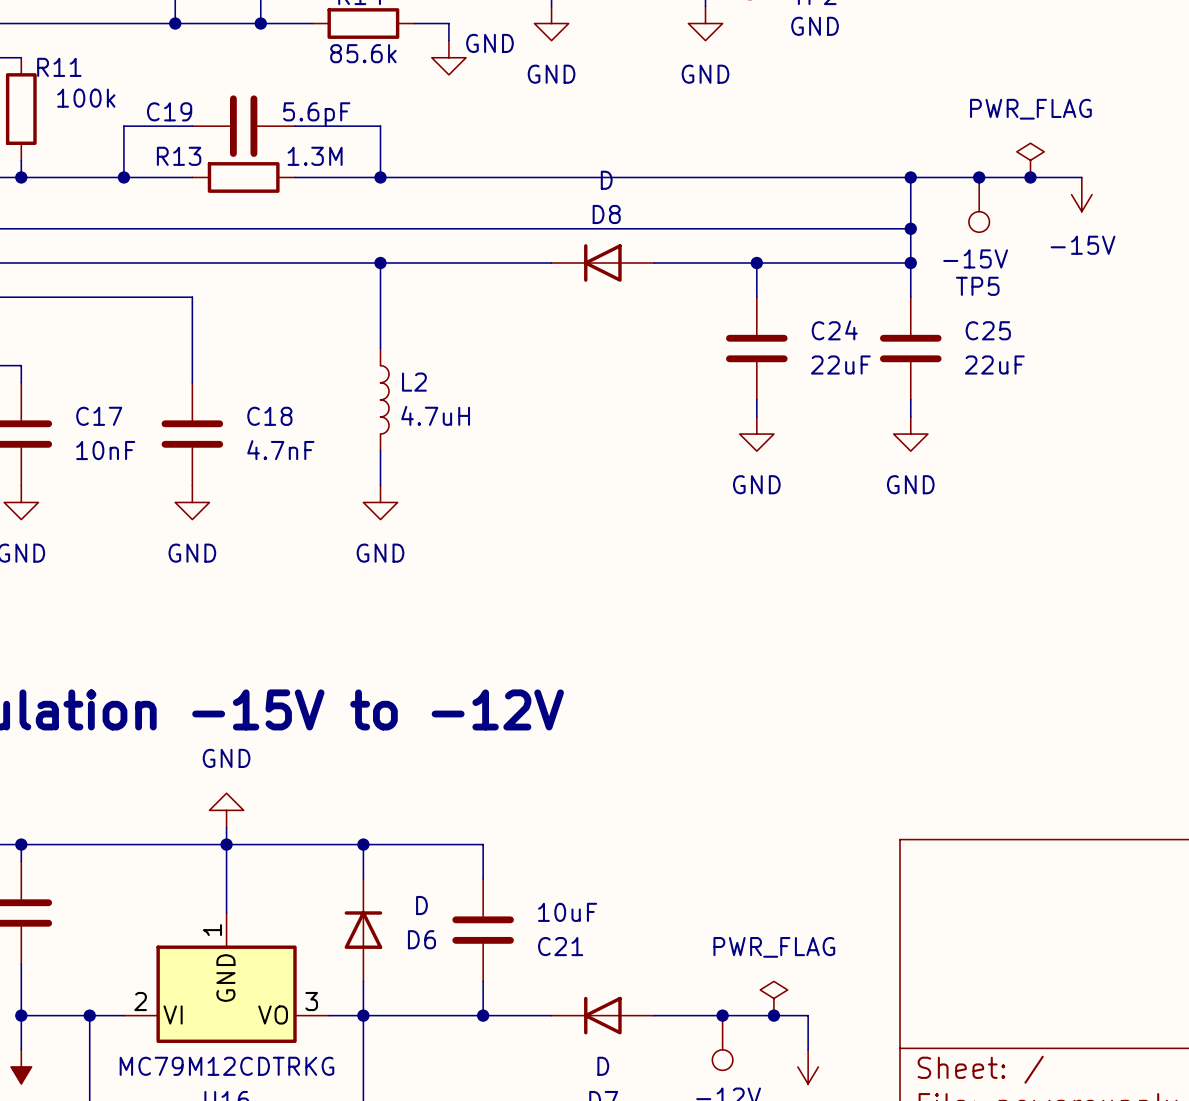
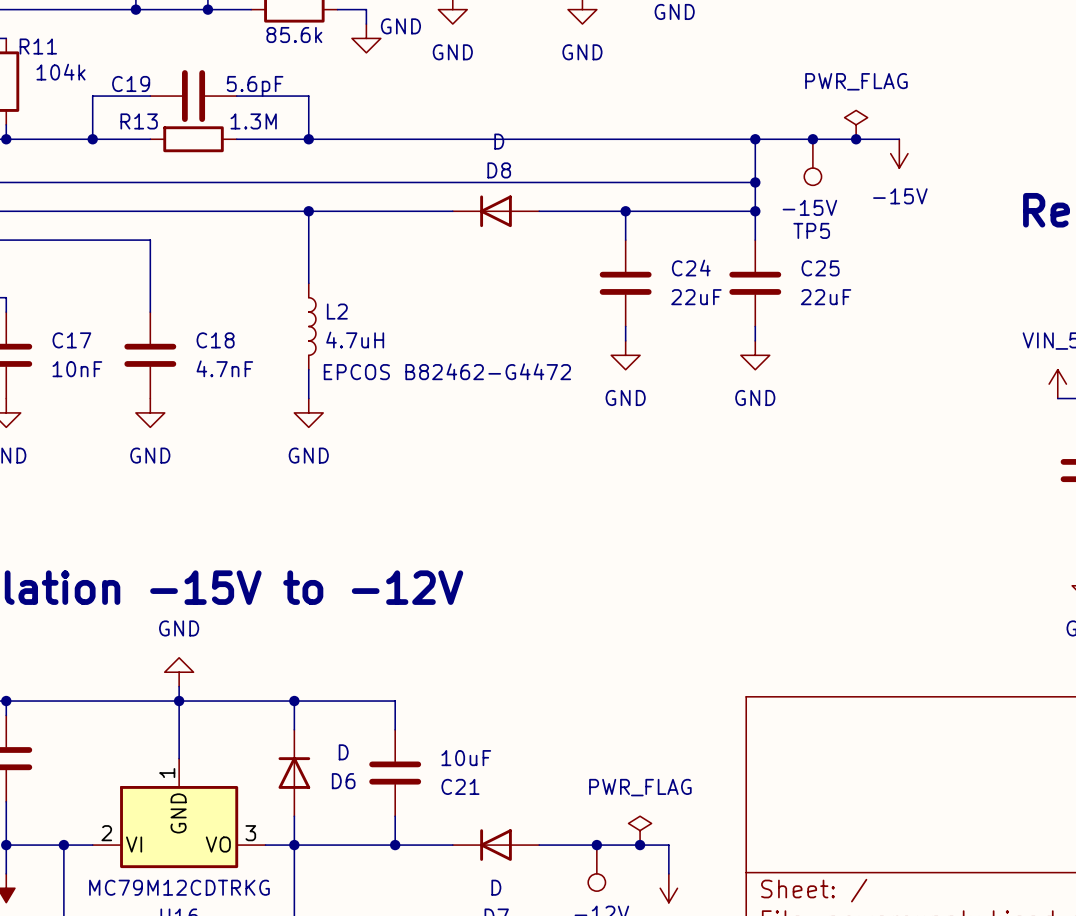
R11 value: 100k (86, 98) -> 104k (61, 72)
text: none -> EPCOS B82462-G4472 (447, 371)

